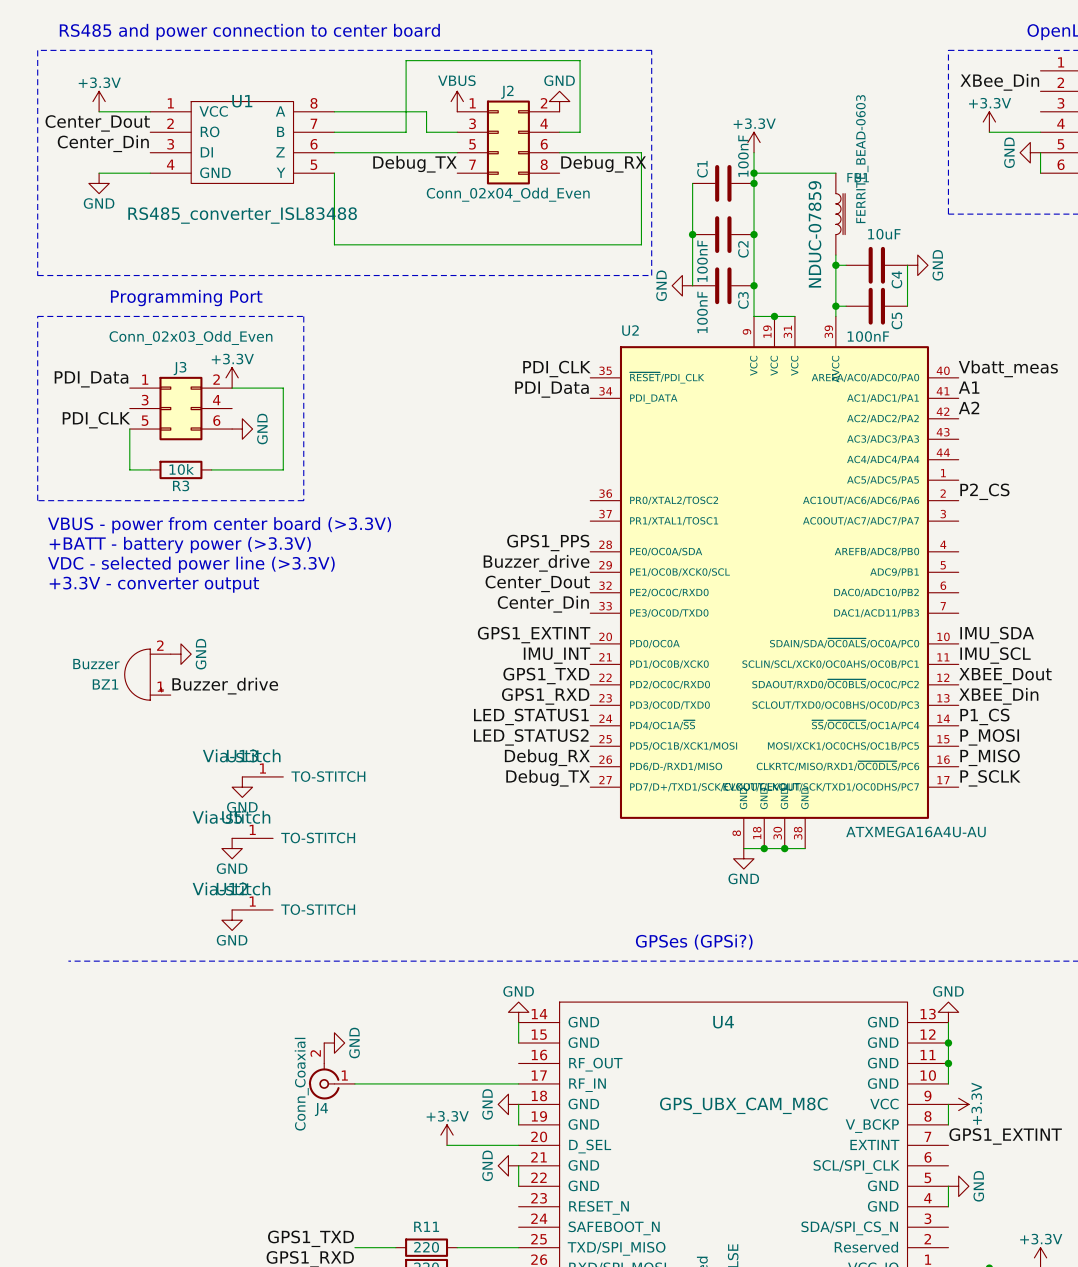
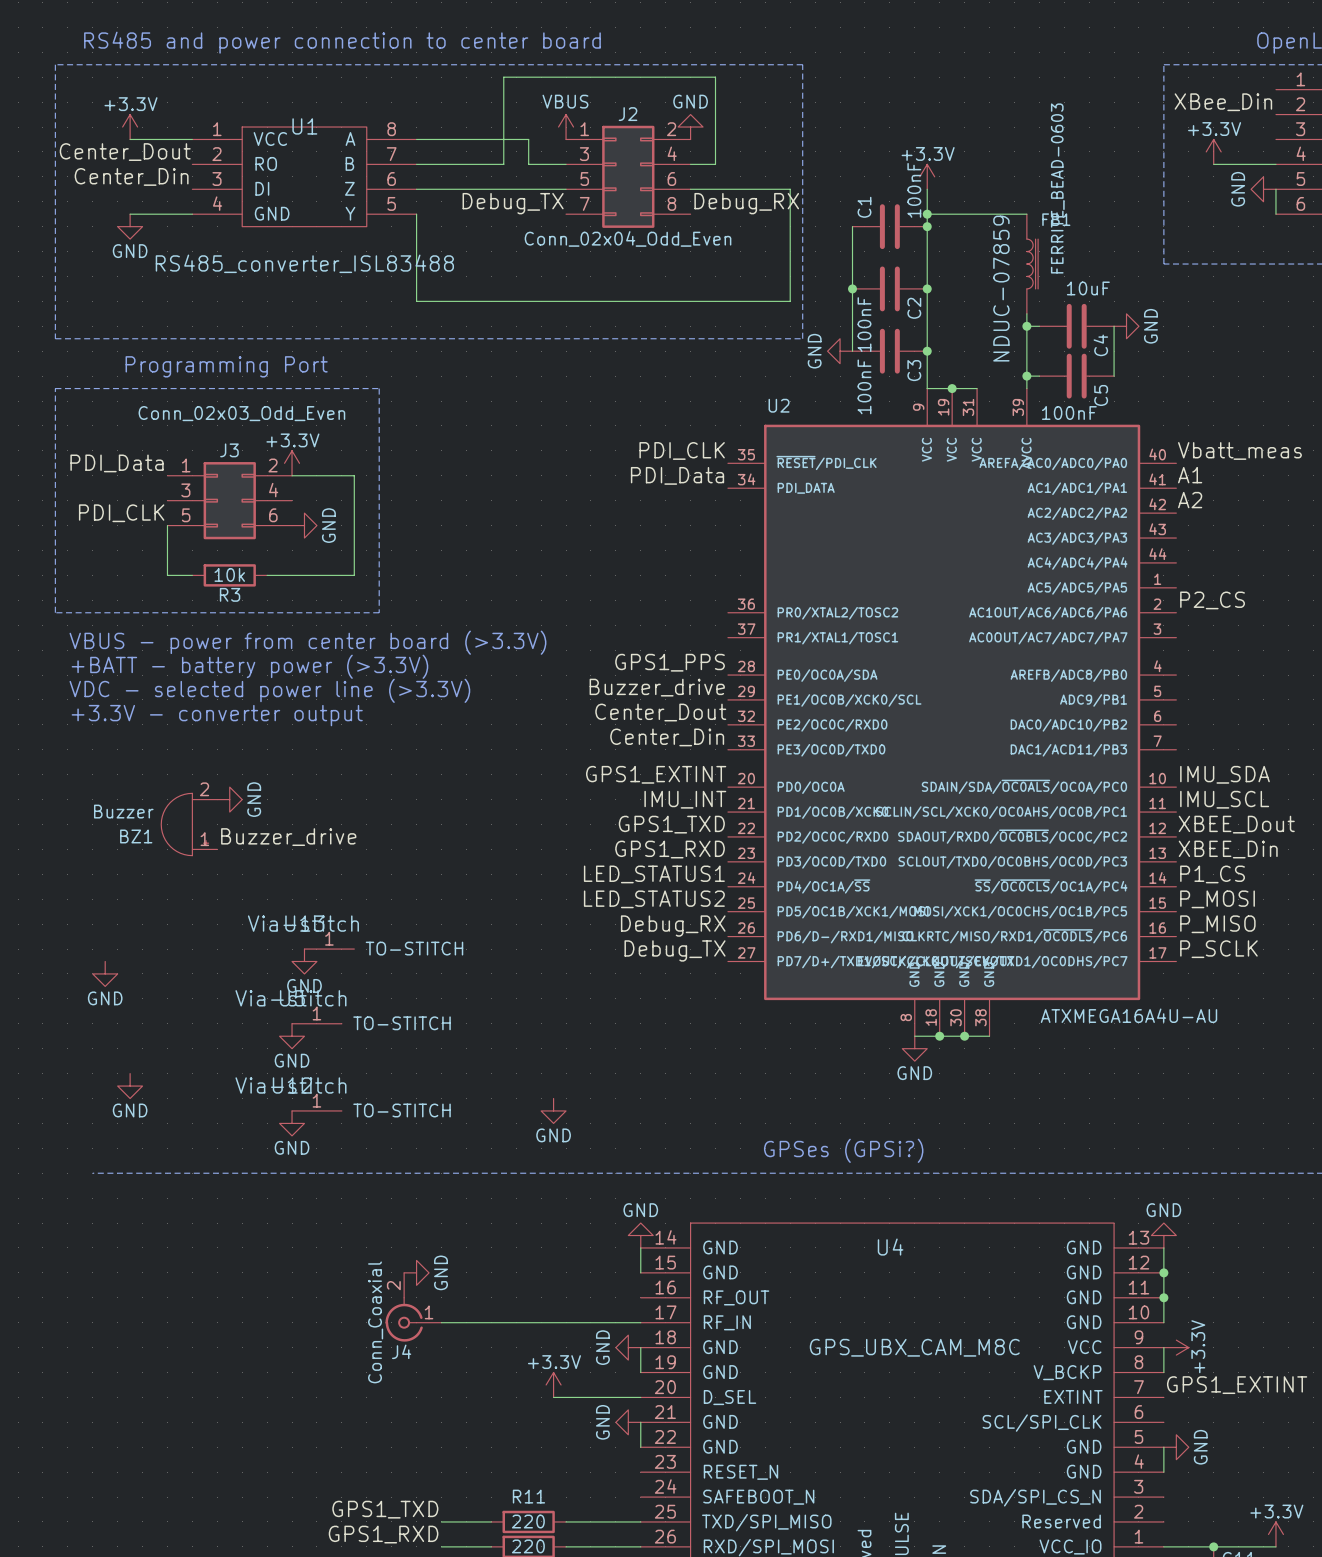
power symbol: none -> GND (105, 973)
power symbol: none -> GND (130, 1086)
power symbol: none -> GND (553, 1110)

